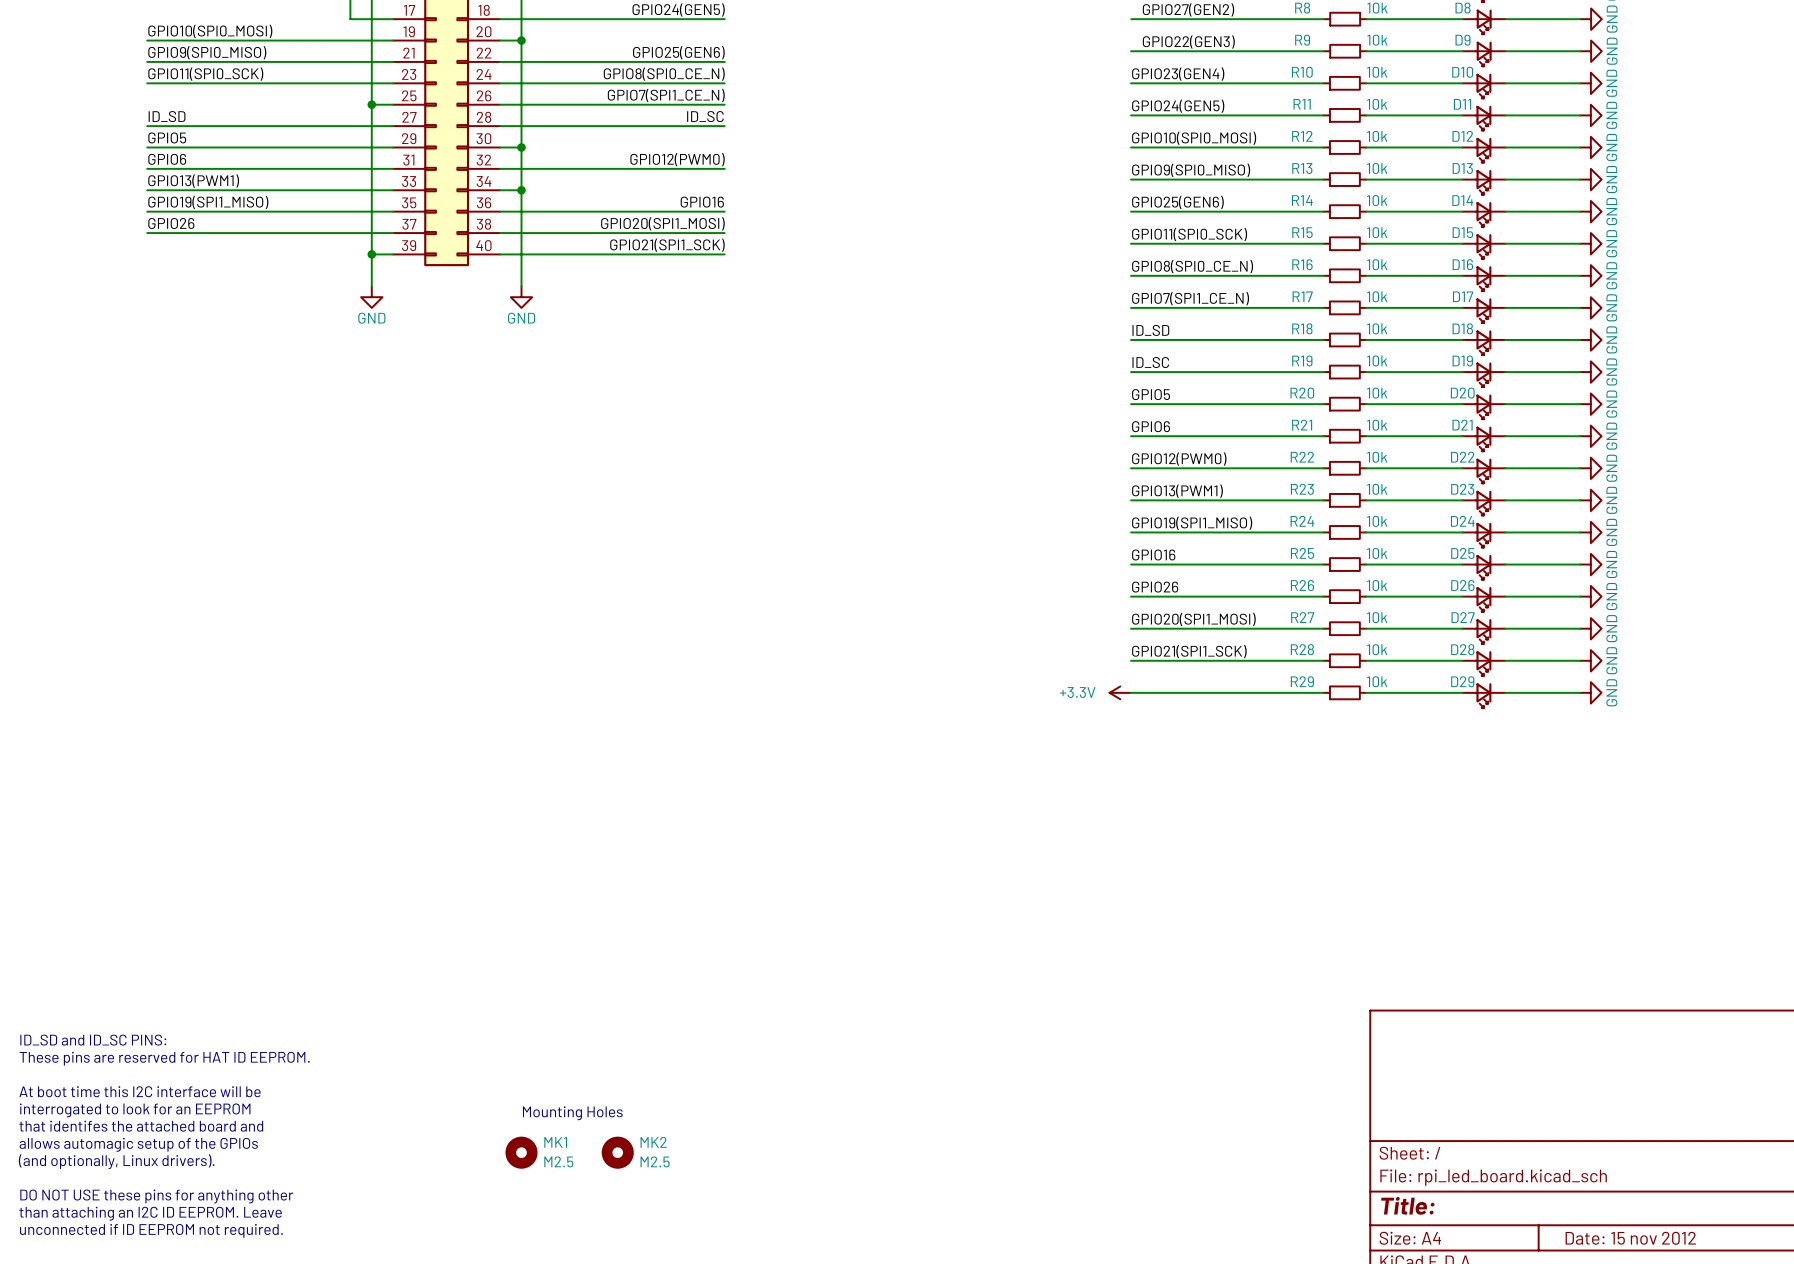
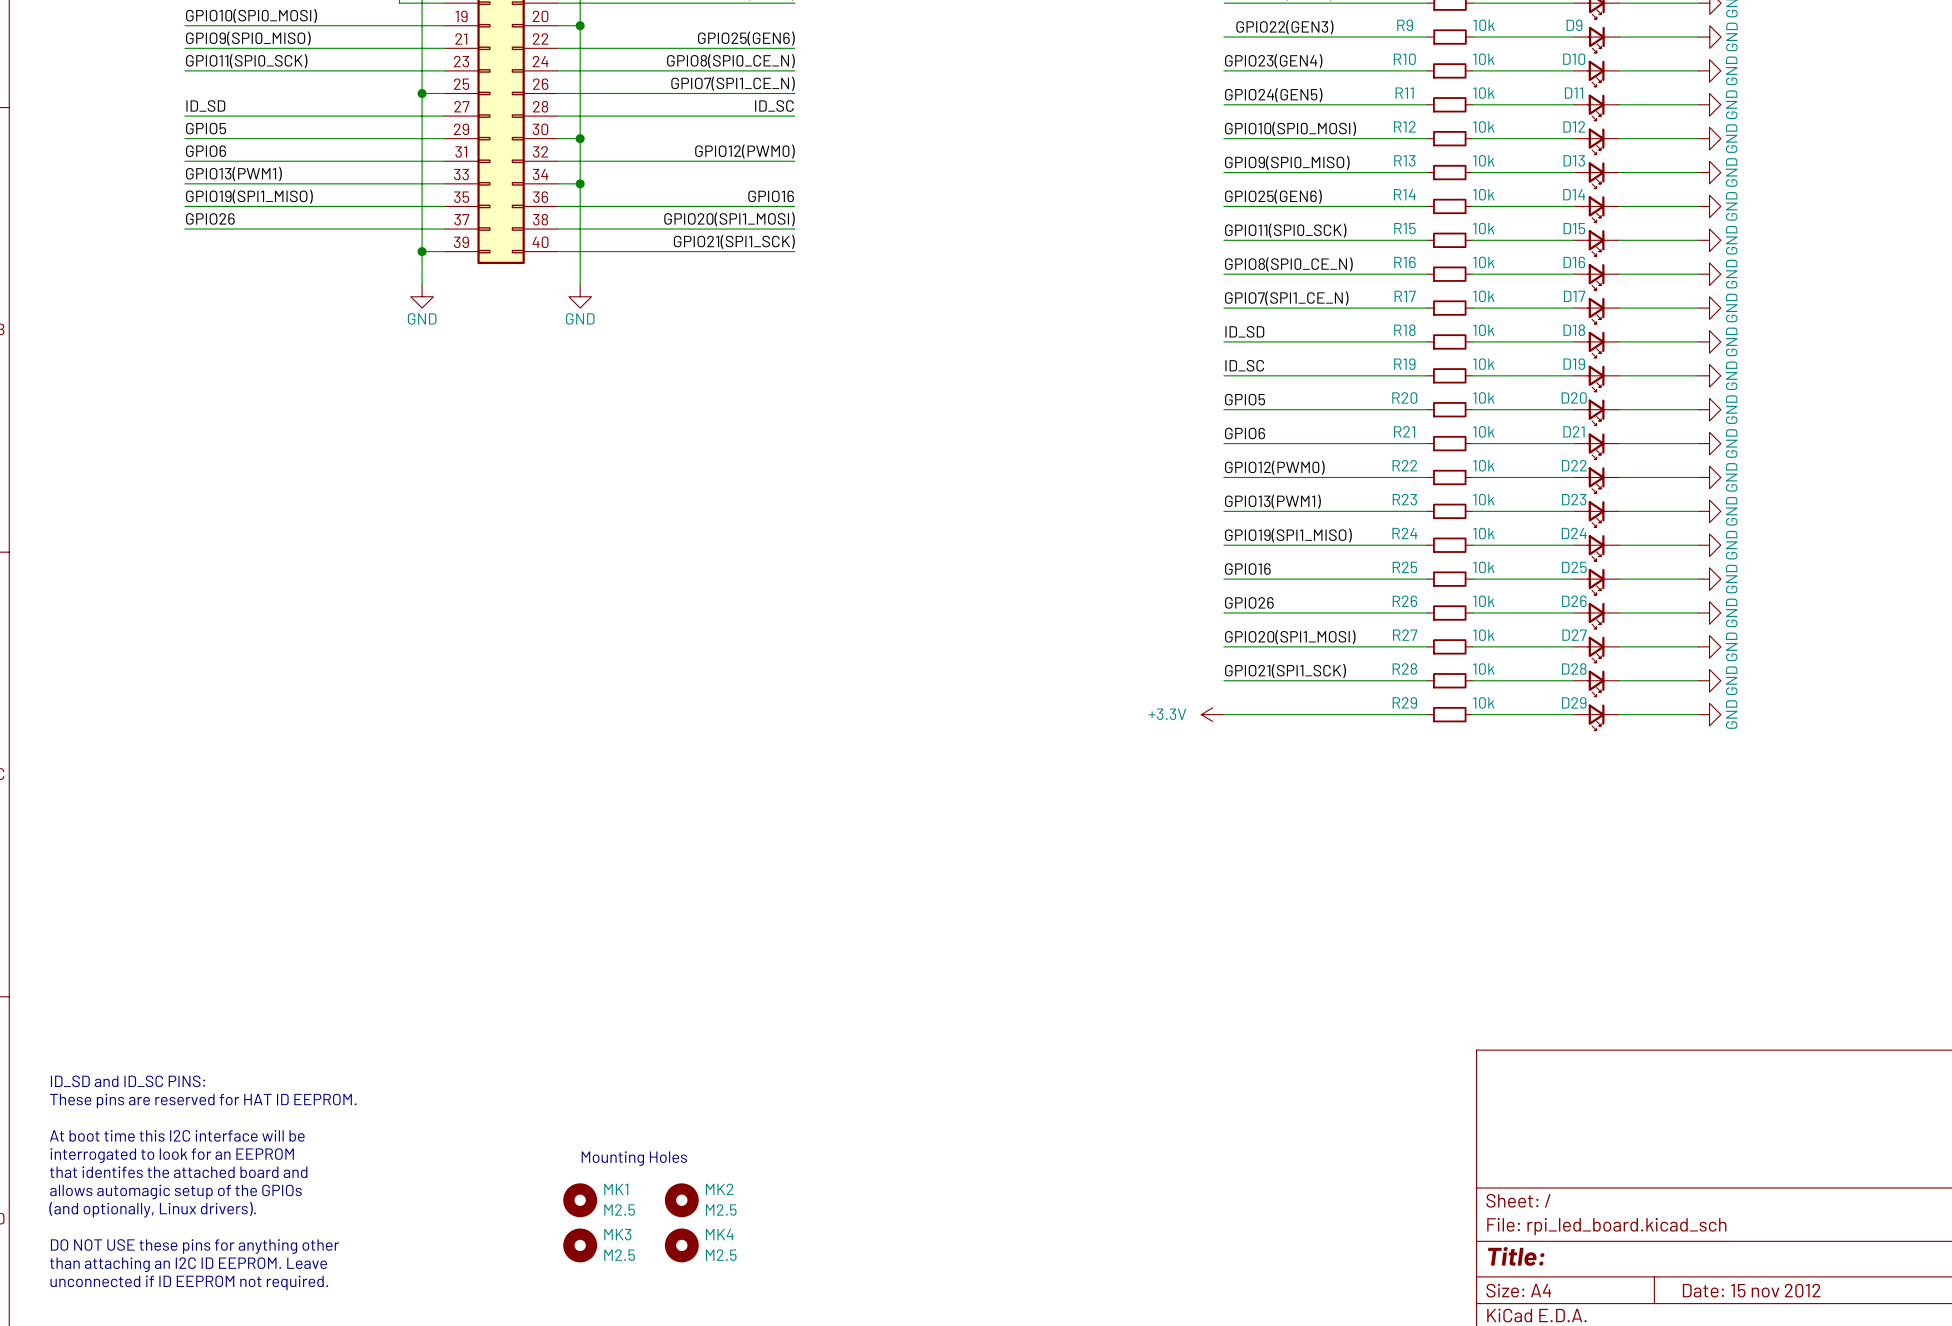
MK3: none -> M2.5 (580, 1245)
MK4: none -> M2.5 (681, 1245)

